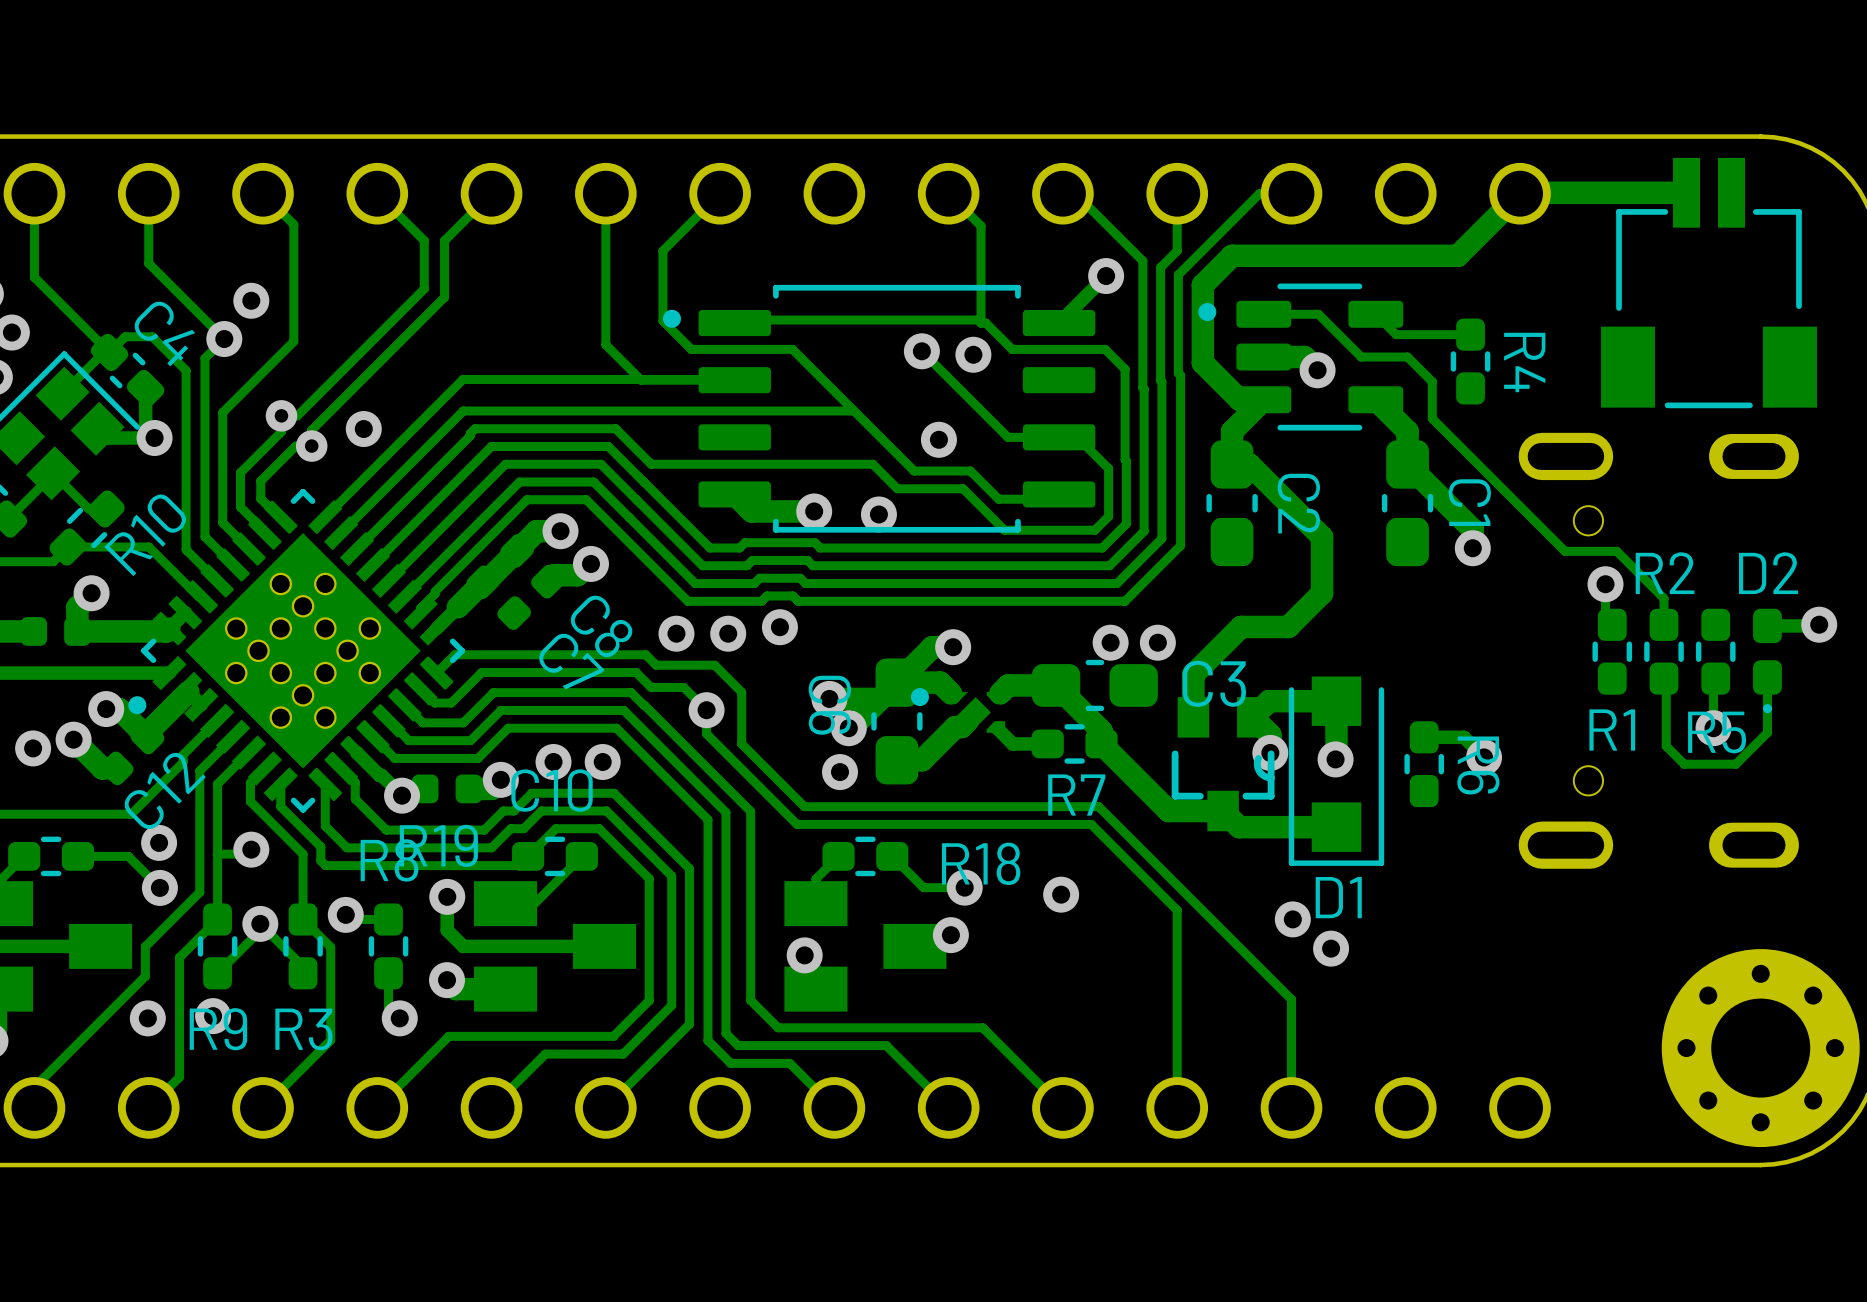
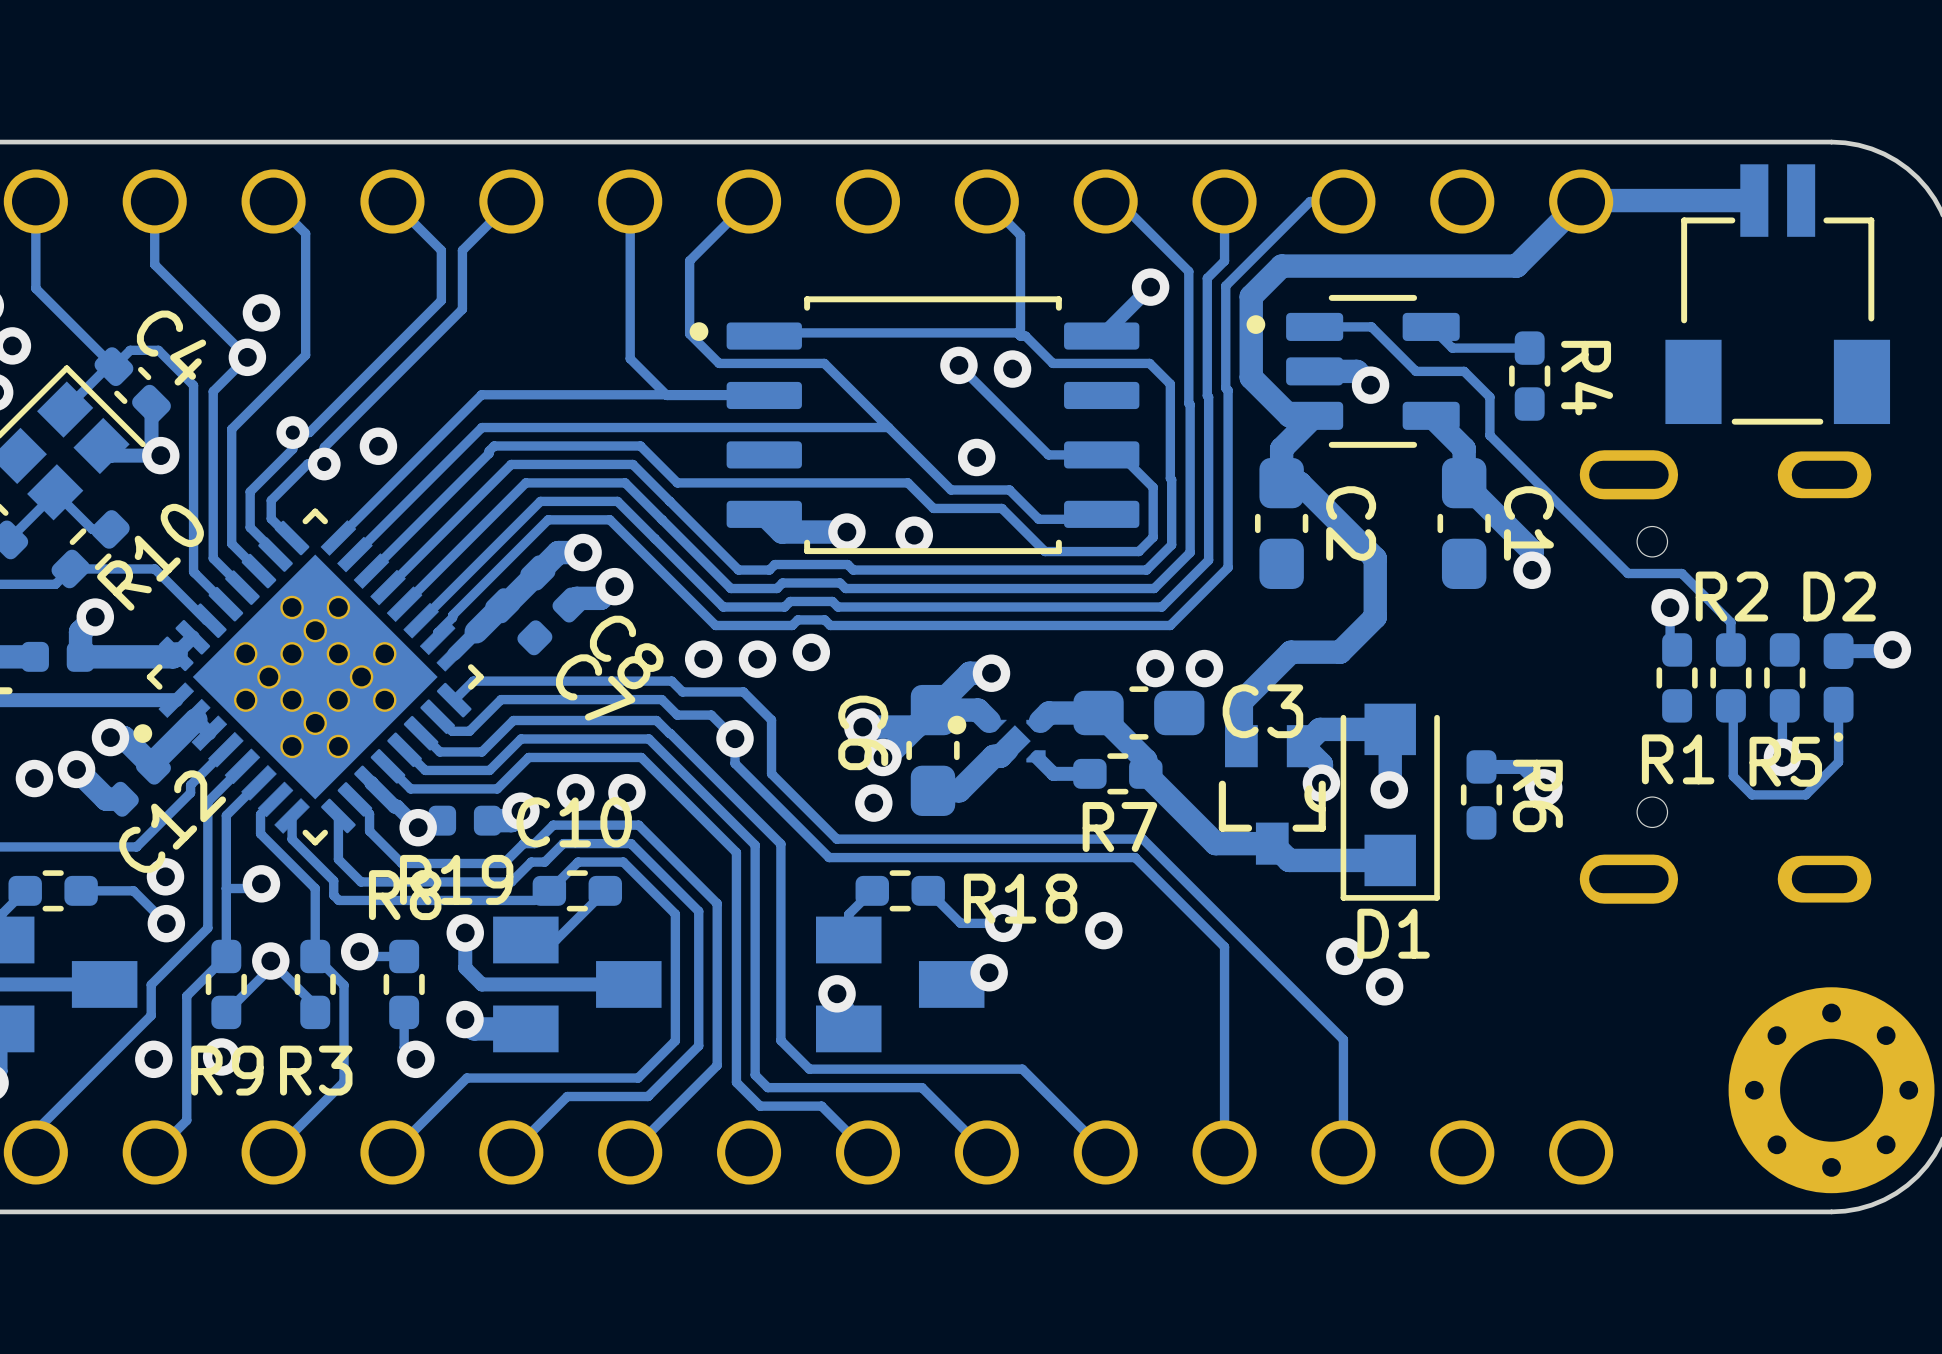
track: (148, 254) (148, 263) (224, 339) (204, 358) (204, 376) -> (154, 264) (247, 357) (213, 391)
via position: (224, 339) -> (247, 357)

